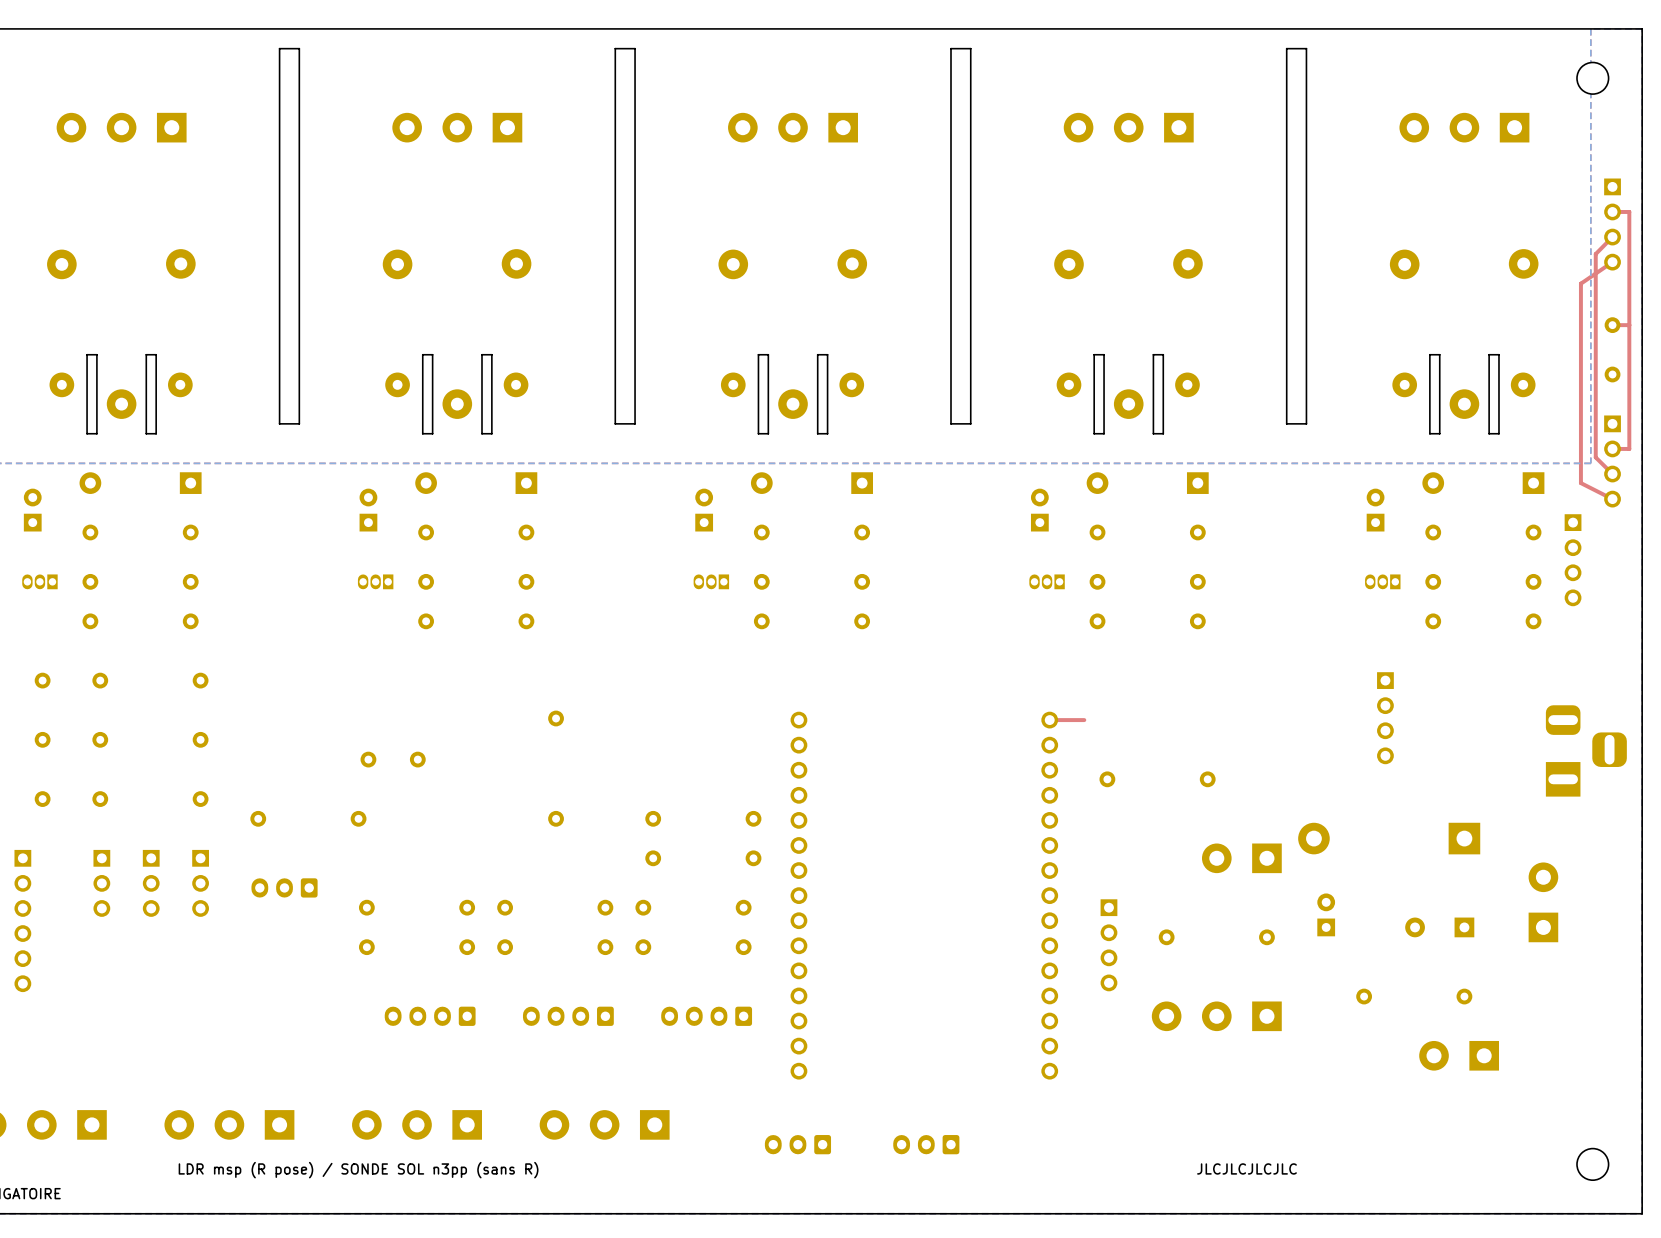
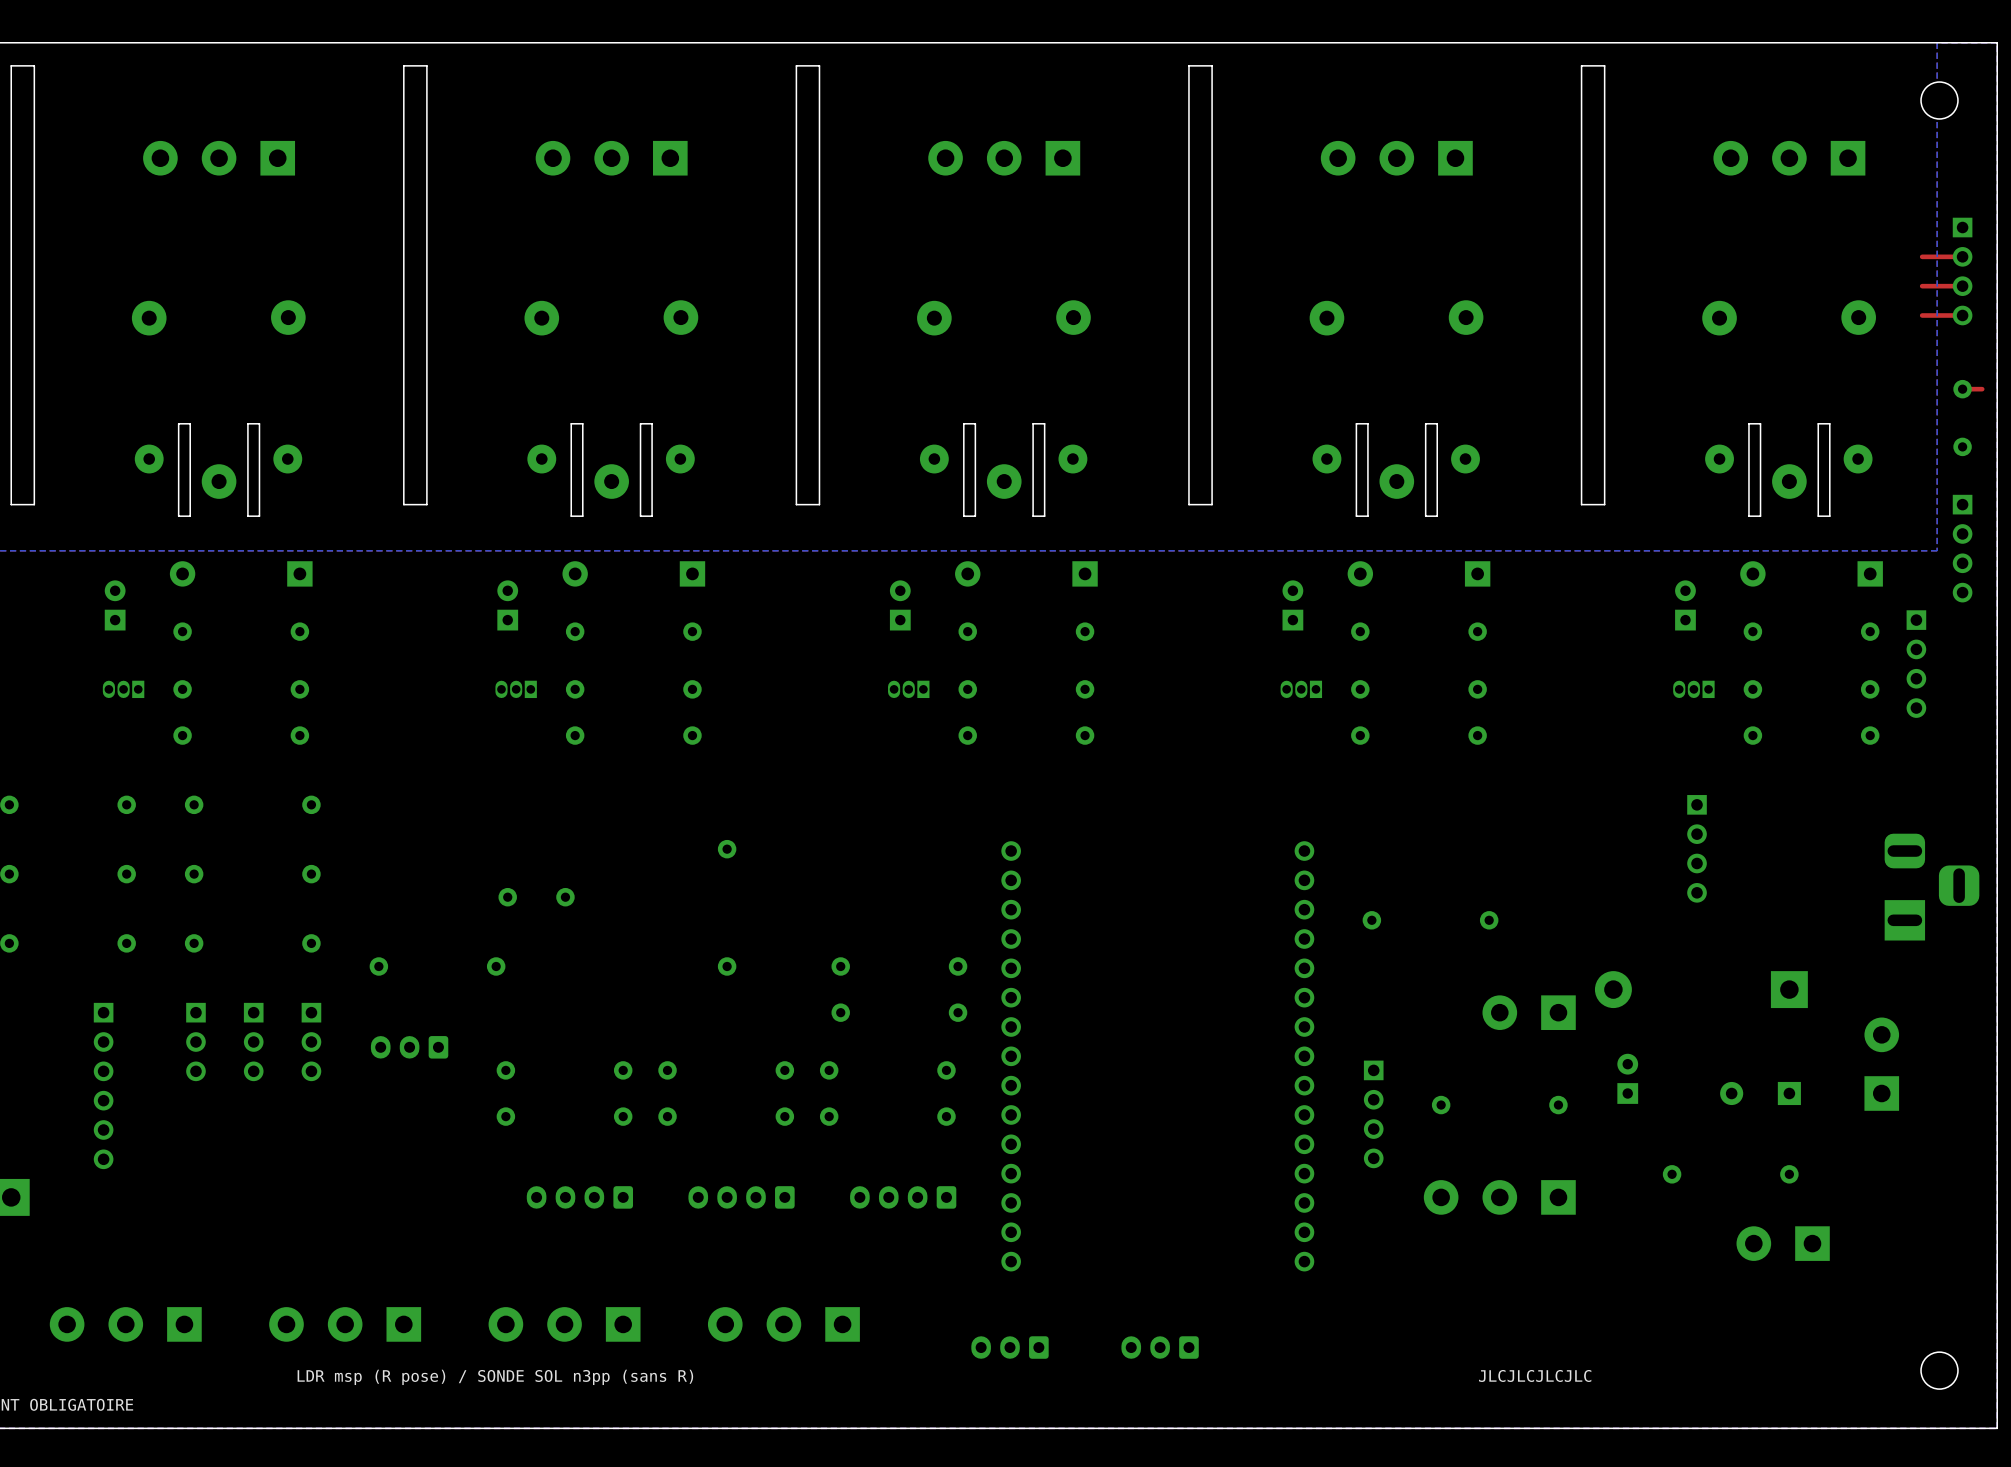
top track: (1612, 211) (1629, 211) (1629, 448) (1612, 448) -> (1962, 256) (1922, 256)
top track: (1612, 237) (1595, 254) (1595, 457) (1612, 474) -> (1962, 286) (1922, 286)
top track: (1612, 262) (1580, 283) (1580, 483) (1612, 499) -> (1962, 315) (1922, 315)
top track: (1084, 720) (1049, 720) -> none

